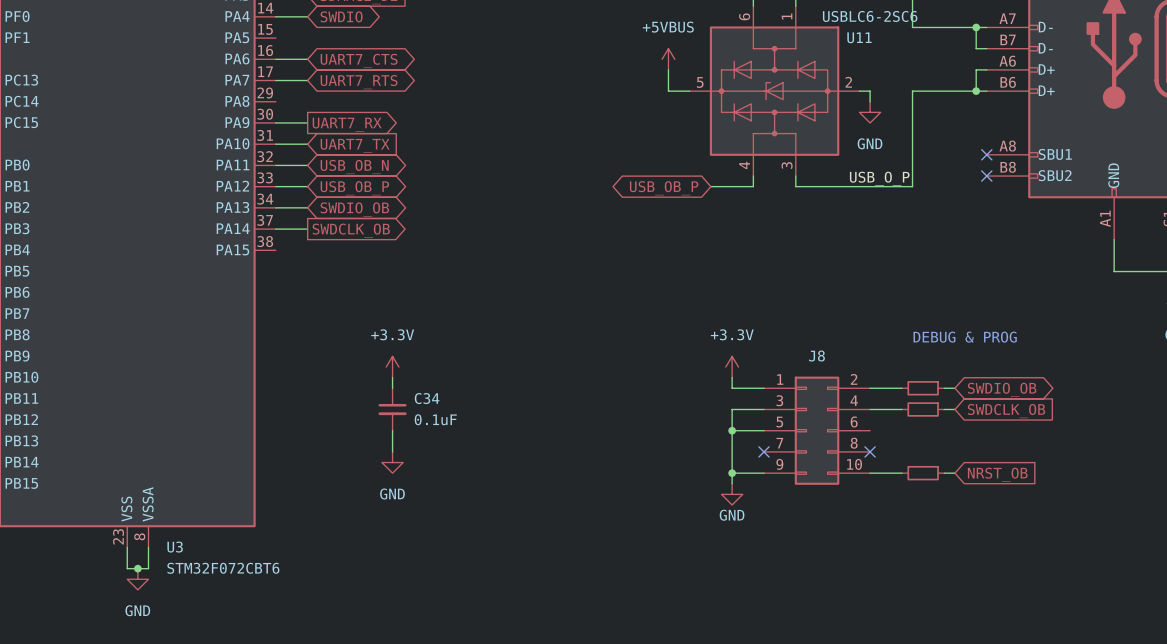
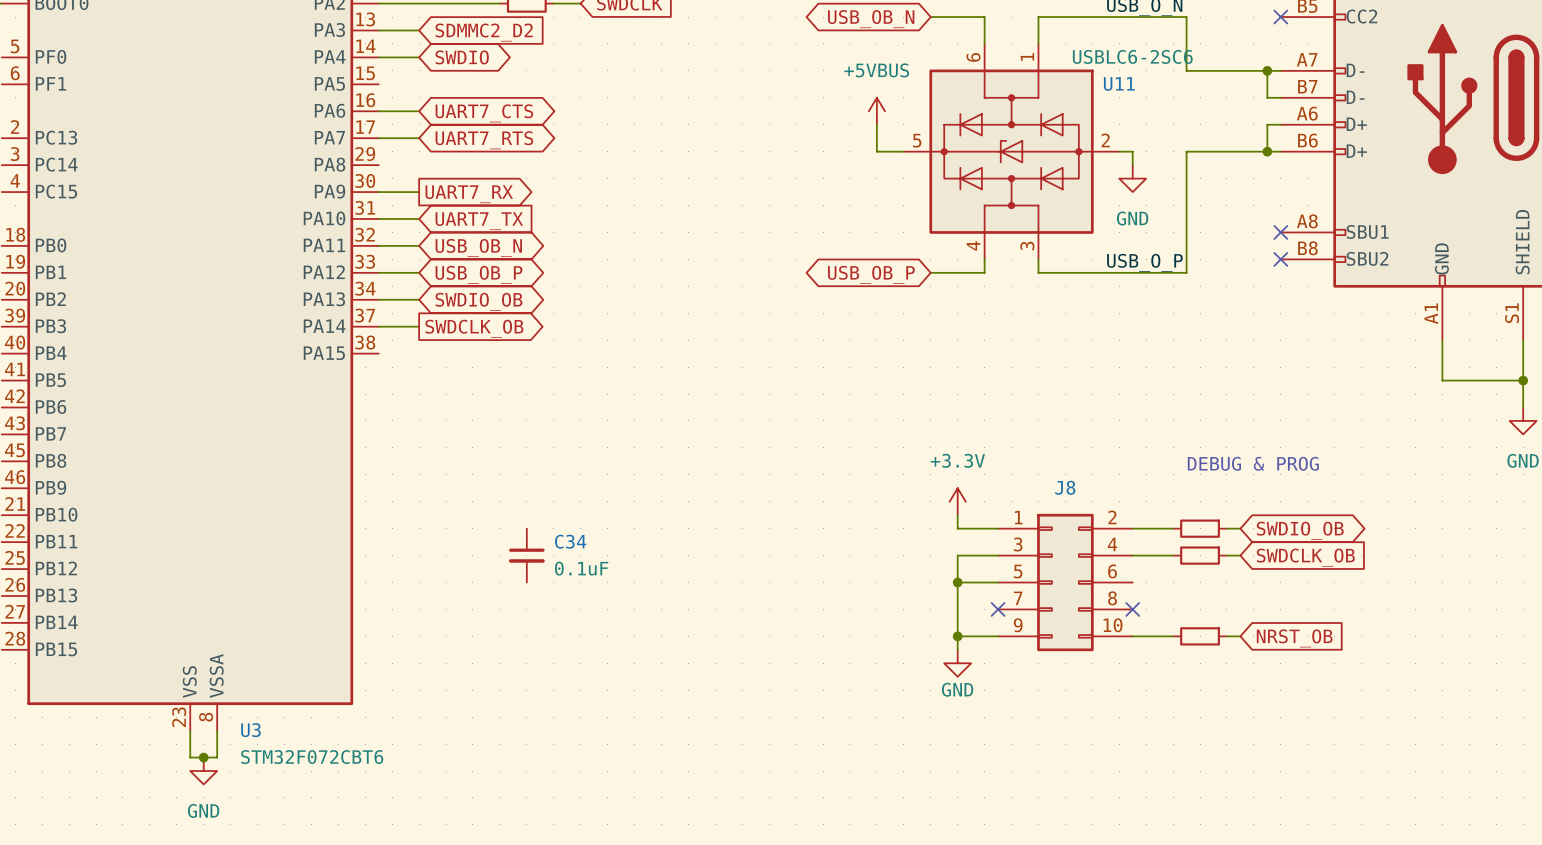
power symbol: +3.3V (392, 367) -> none
wire: (392, 377) (392, 388) -> none
wire: (392, 430) (392, 451) -> none
power symbol: GND (392, 462) -> none

